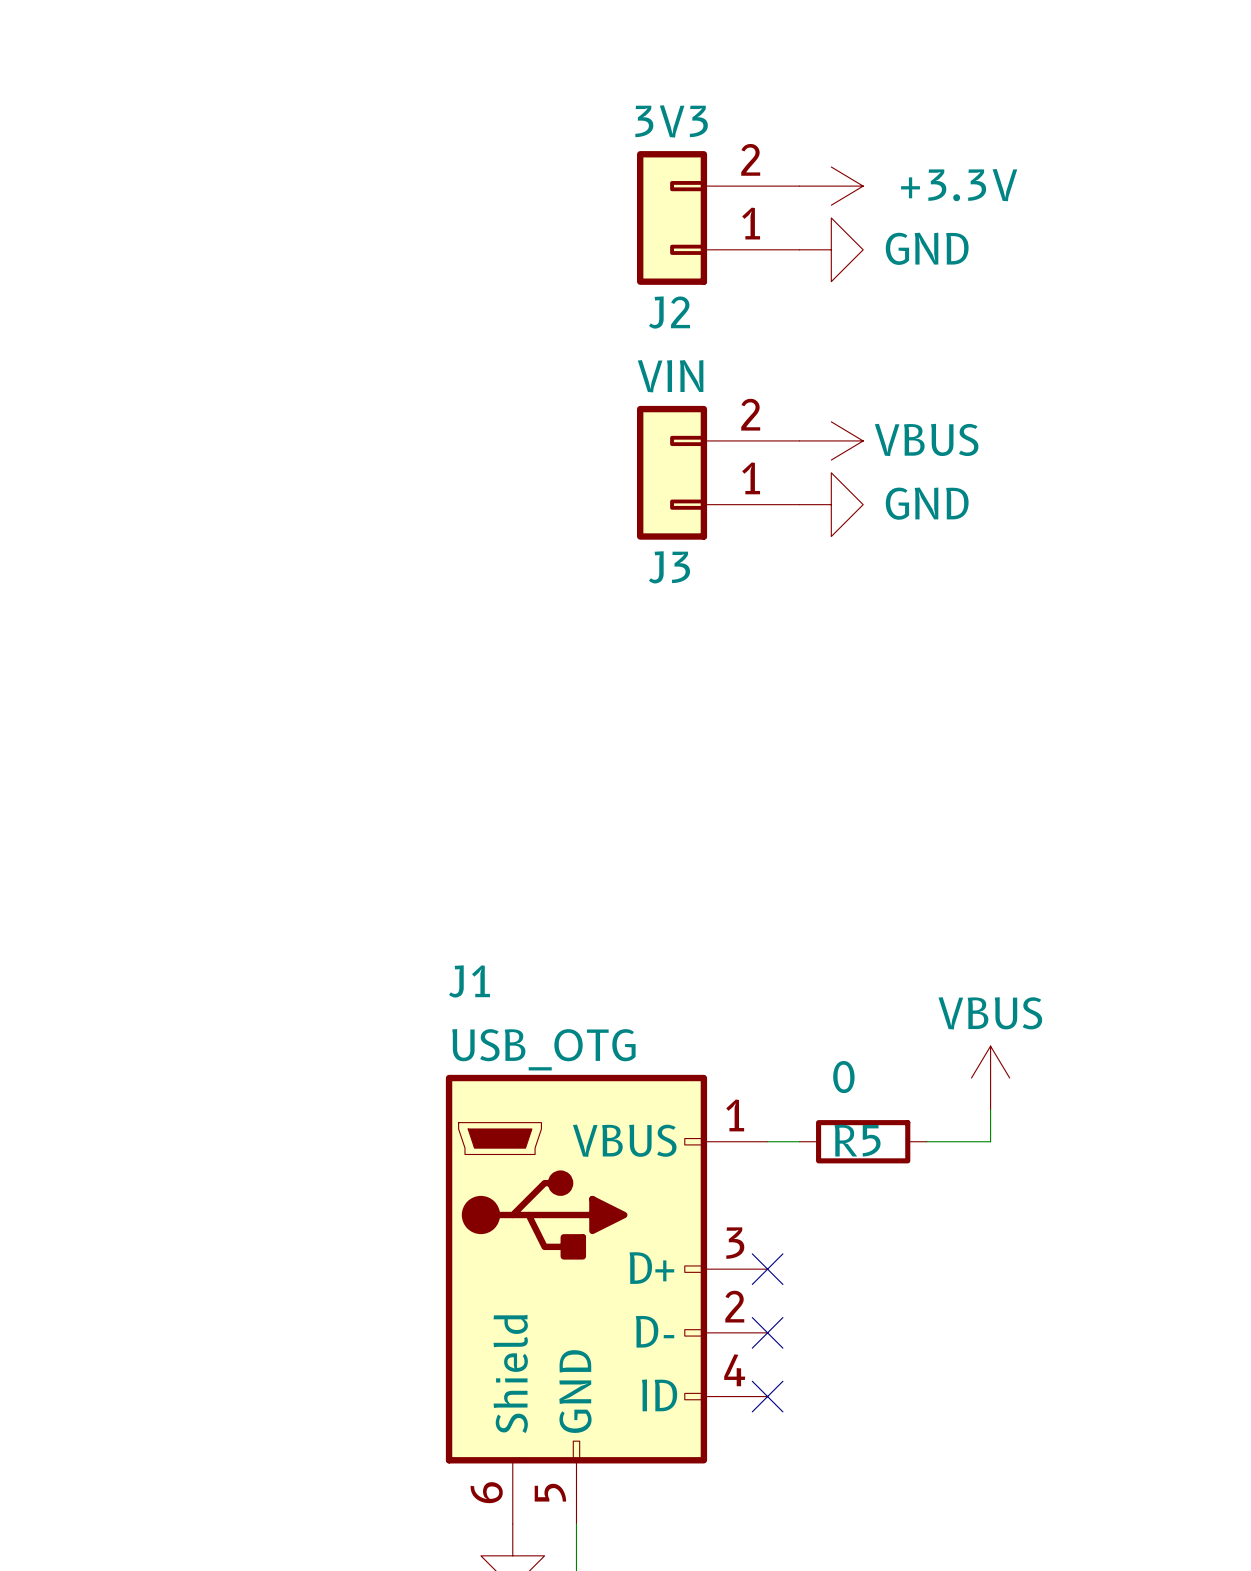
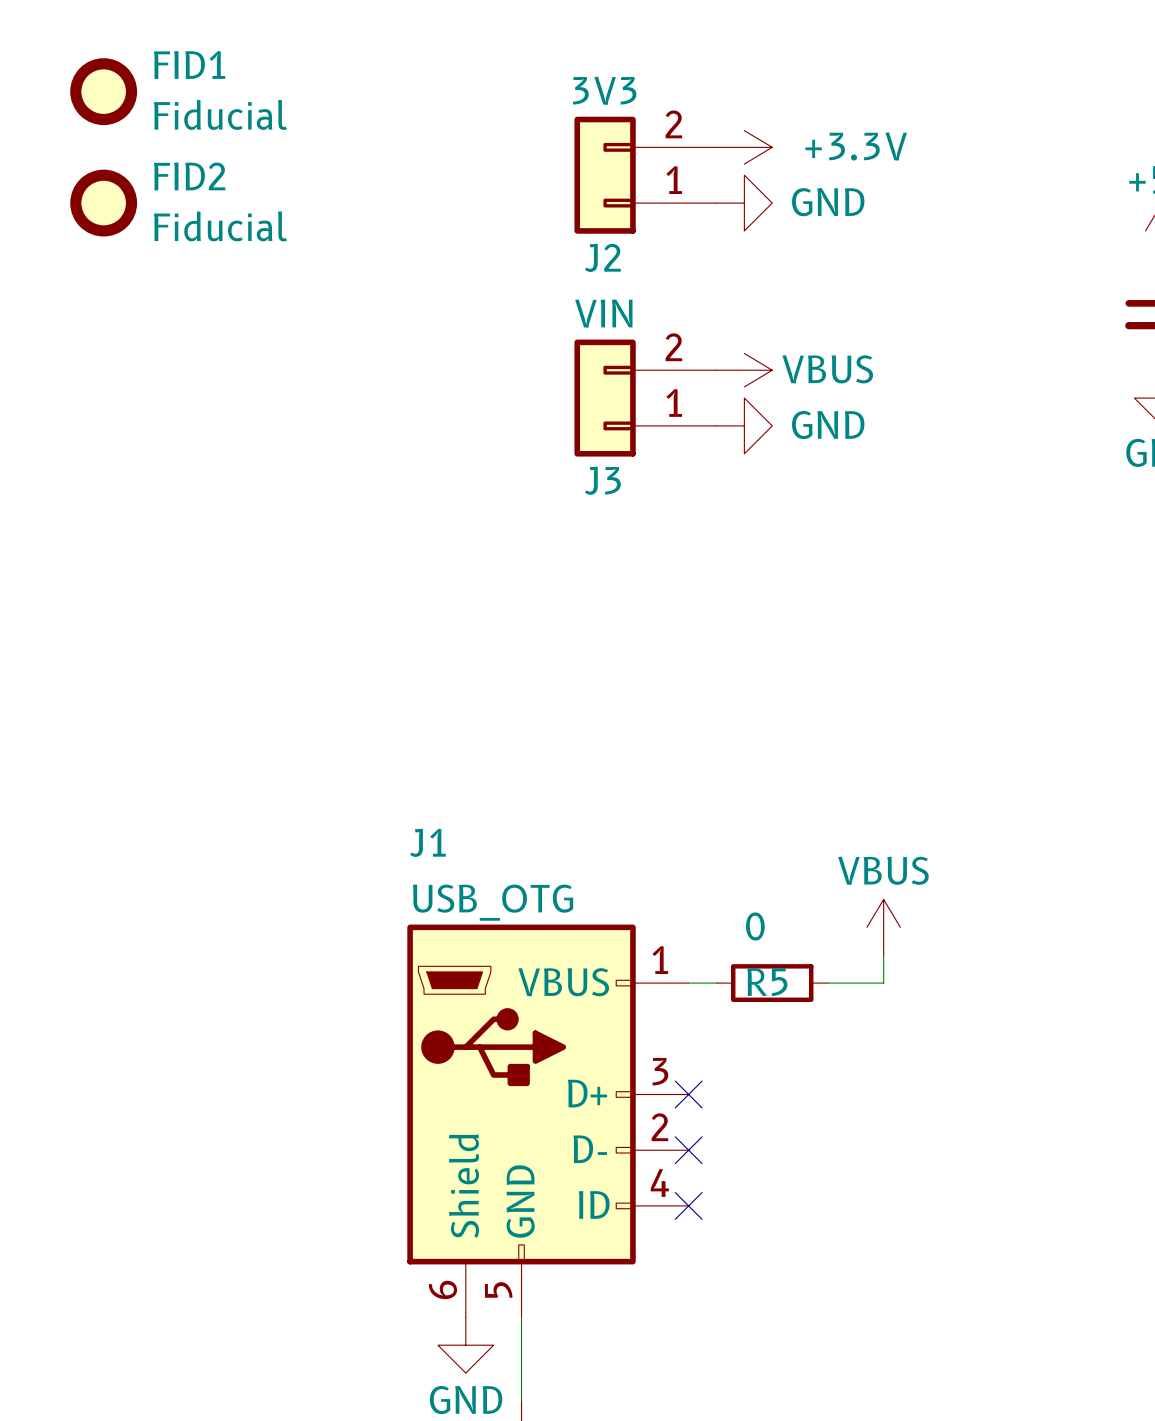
FID1: none -> Fiducial (103, 91)
FID2: none -> Fiducial (103, 203)

